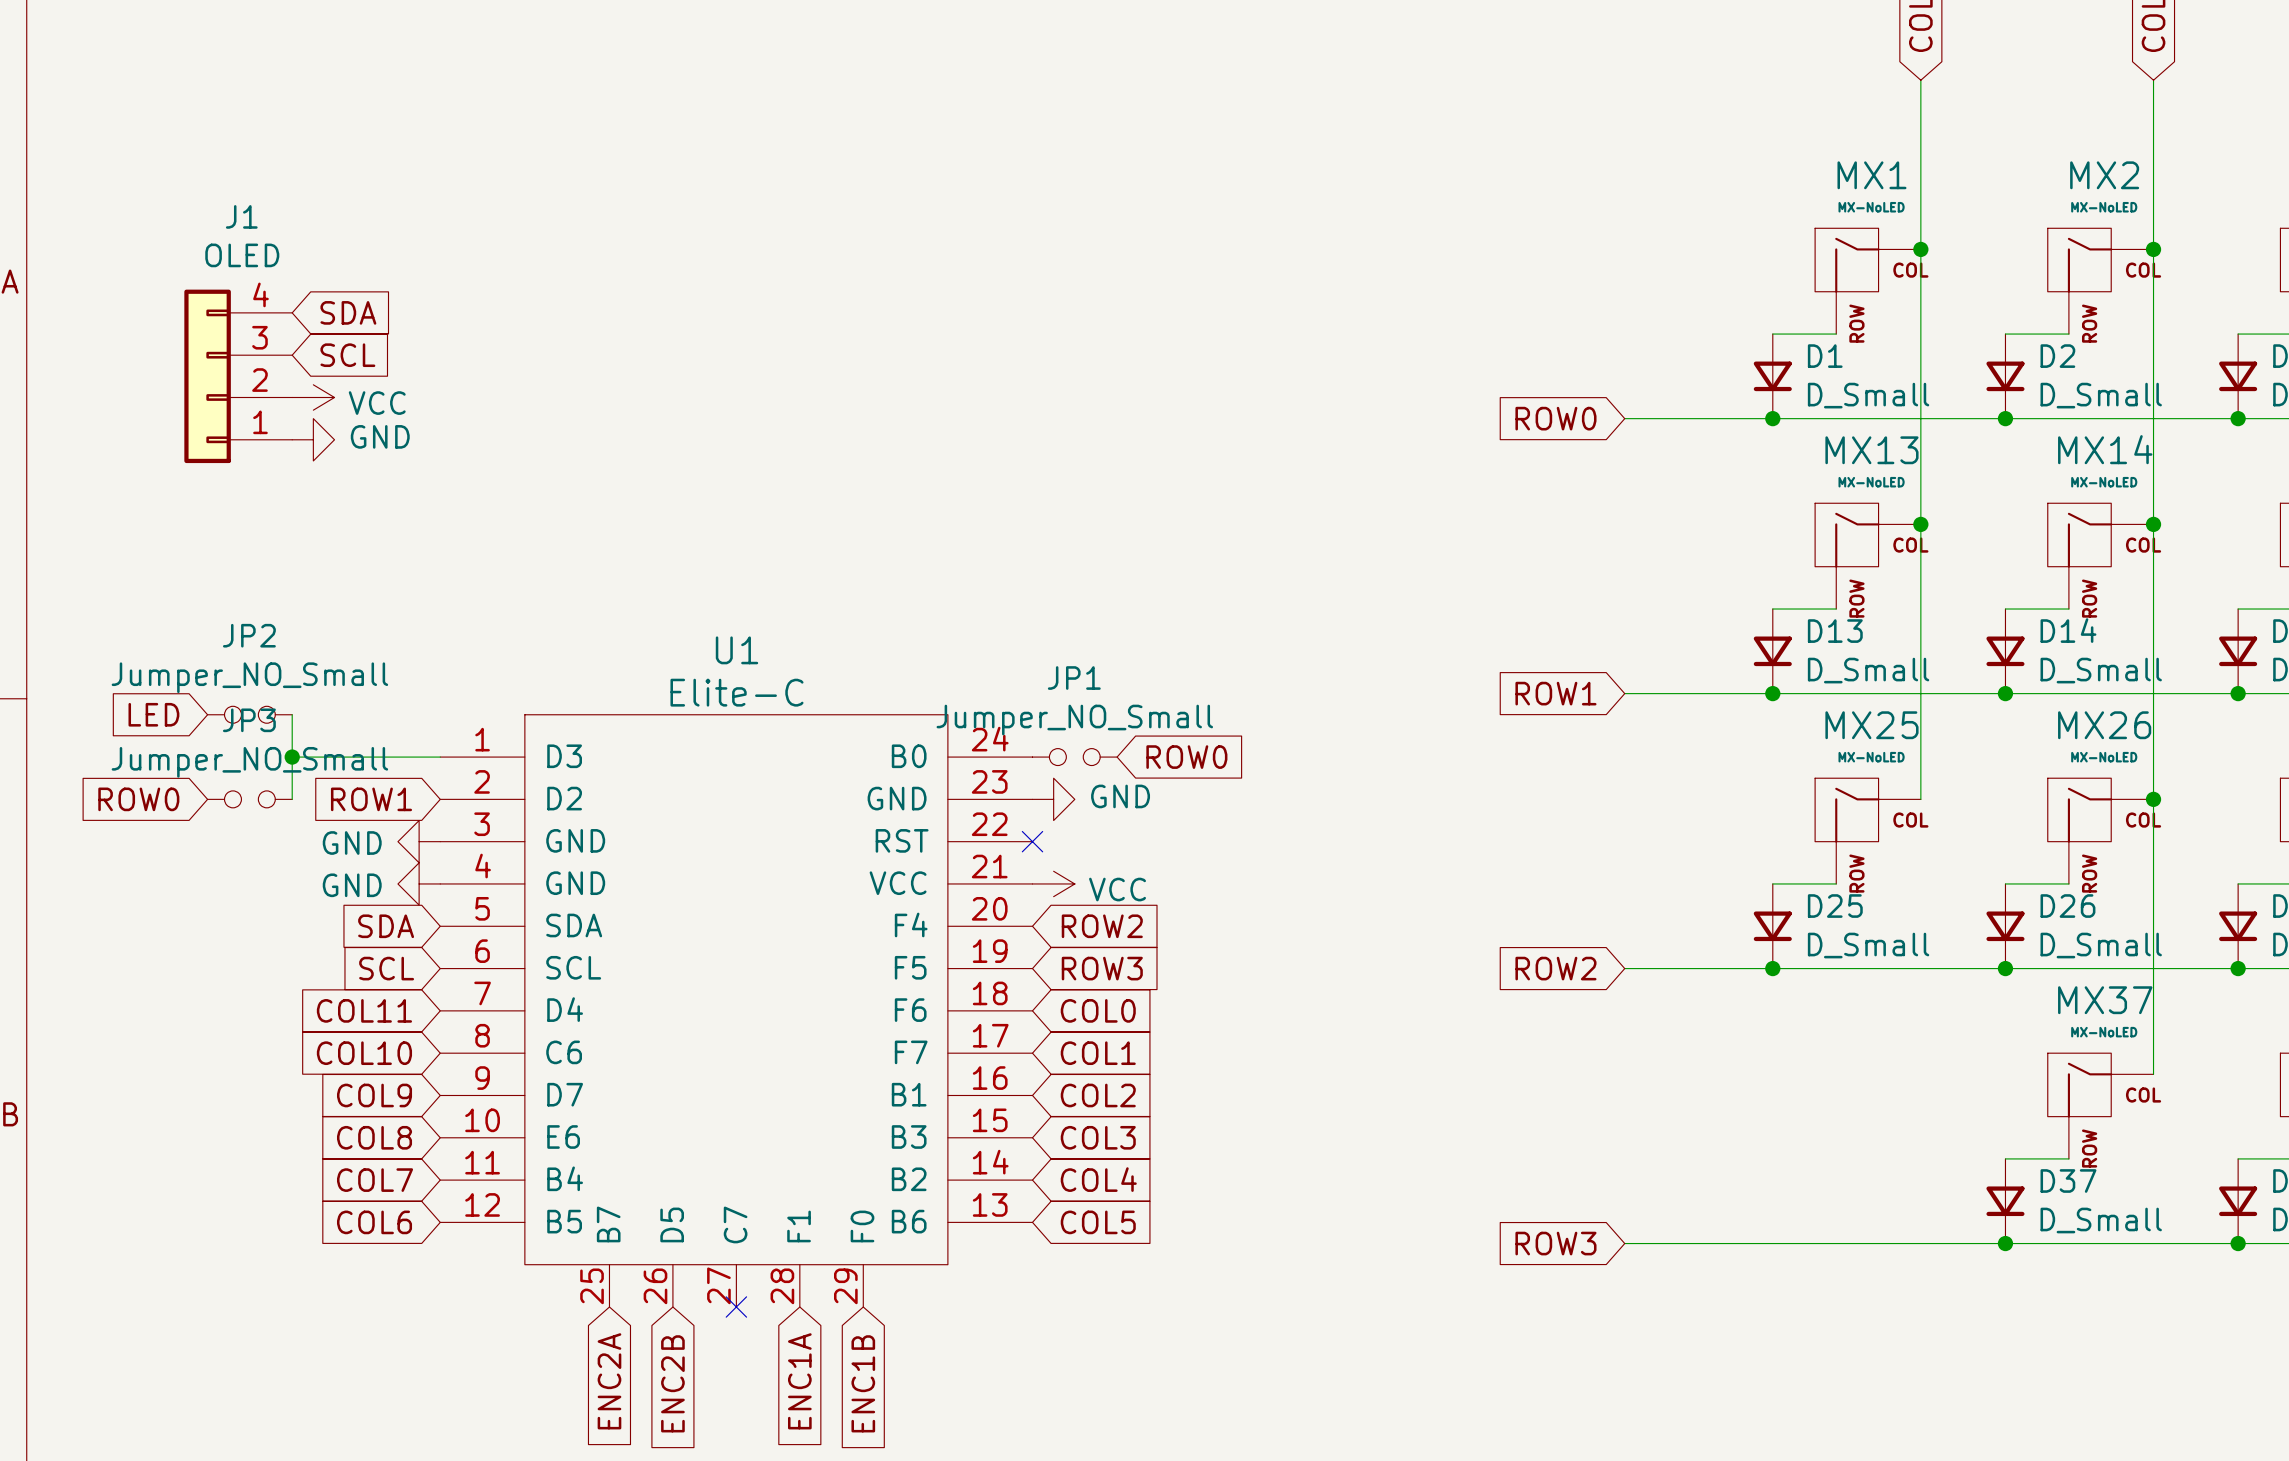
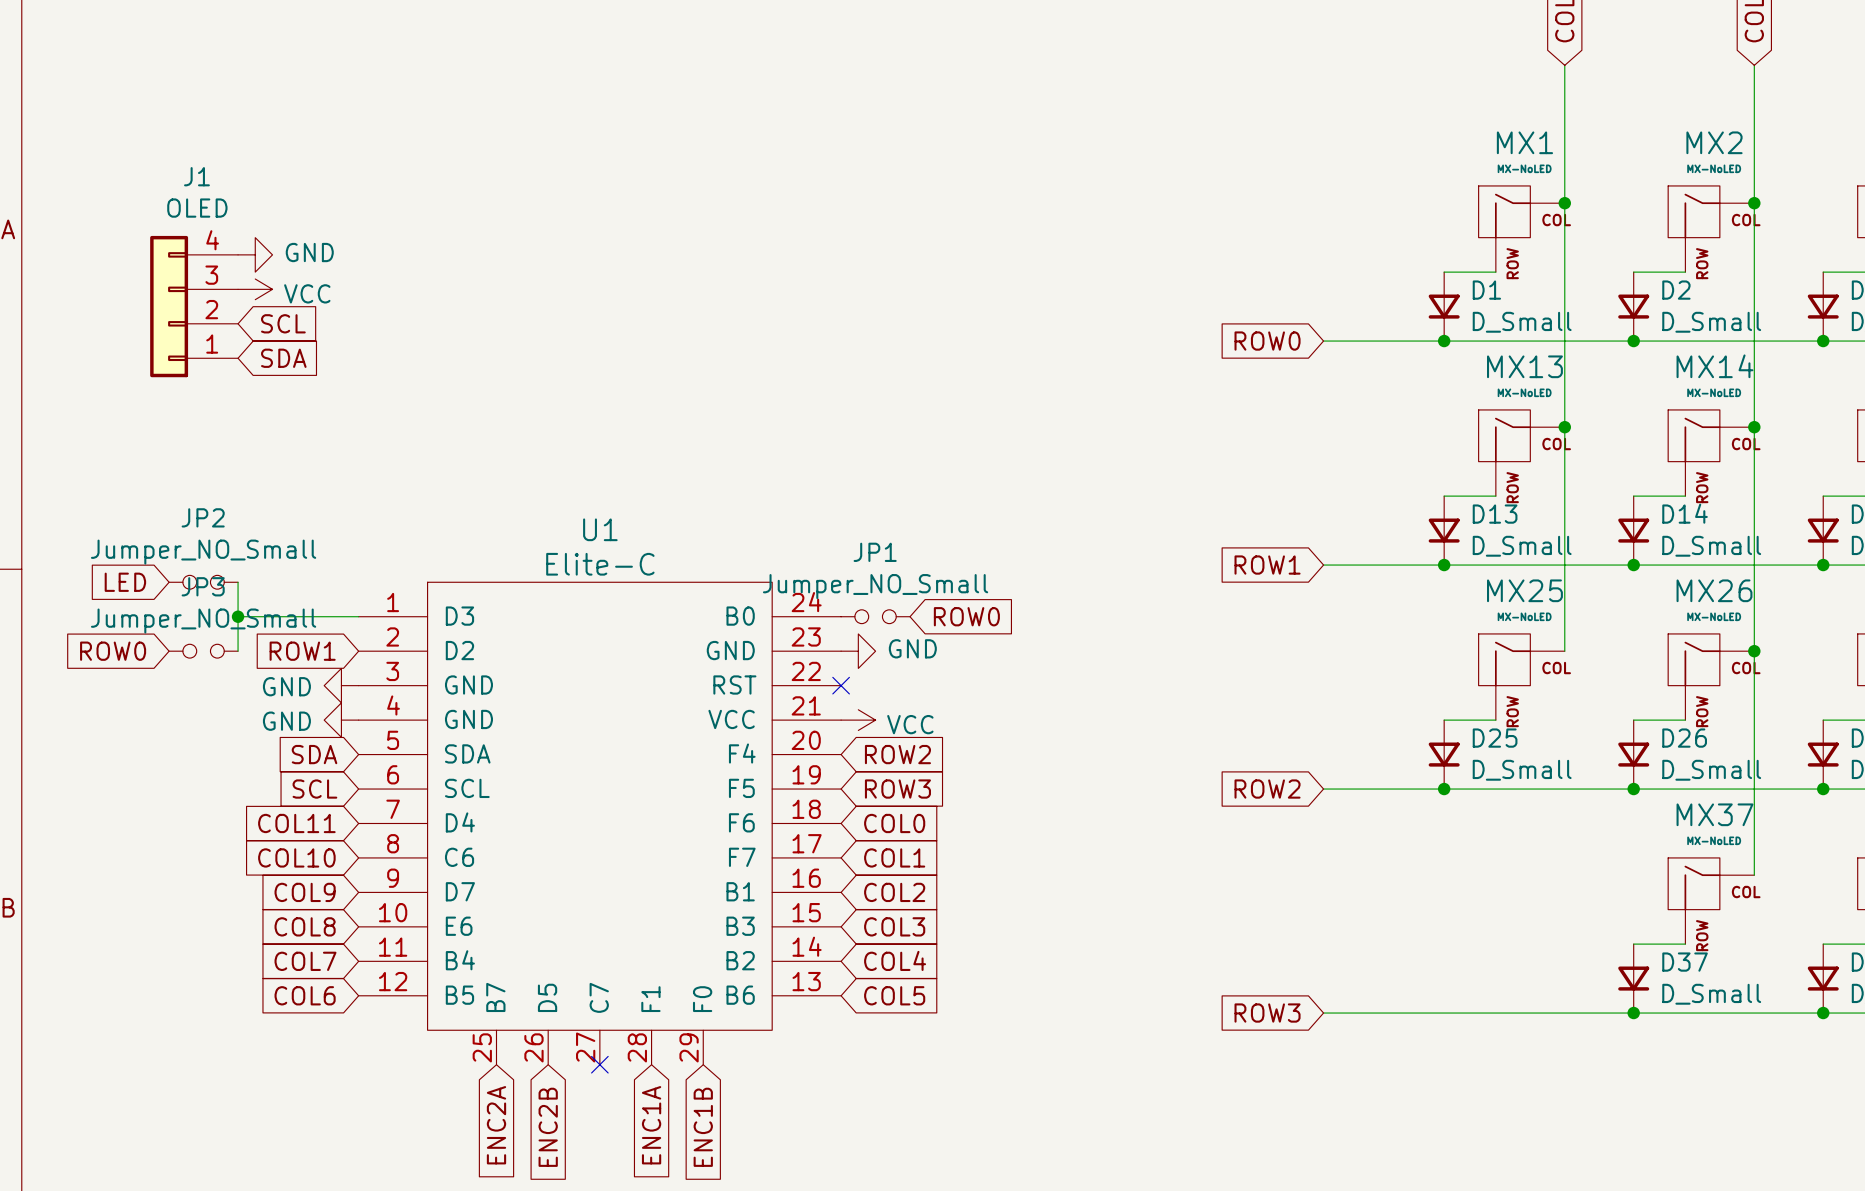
global label position: SDA (348, 312) -> SDA (283, 358)
global label position: SCL (347, 355) -> SCL (283, 323)
power symbol position: VCC (313, 397) -> VCC (255, 289)
power symbol position: GND (313, 439) -> GND (255, 254)

